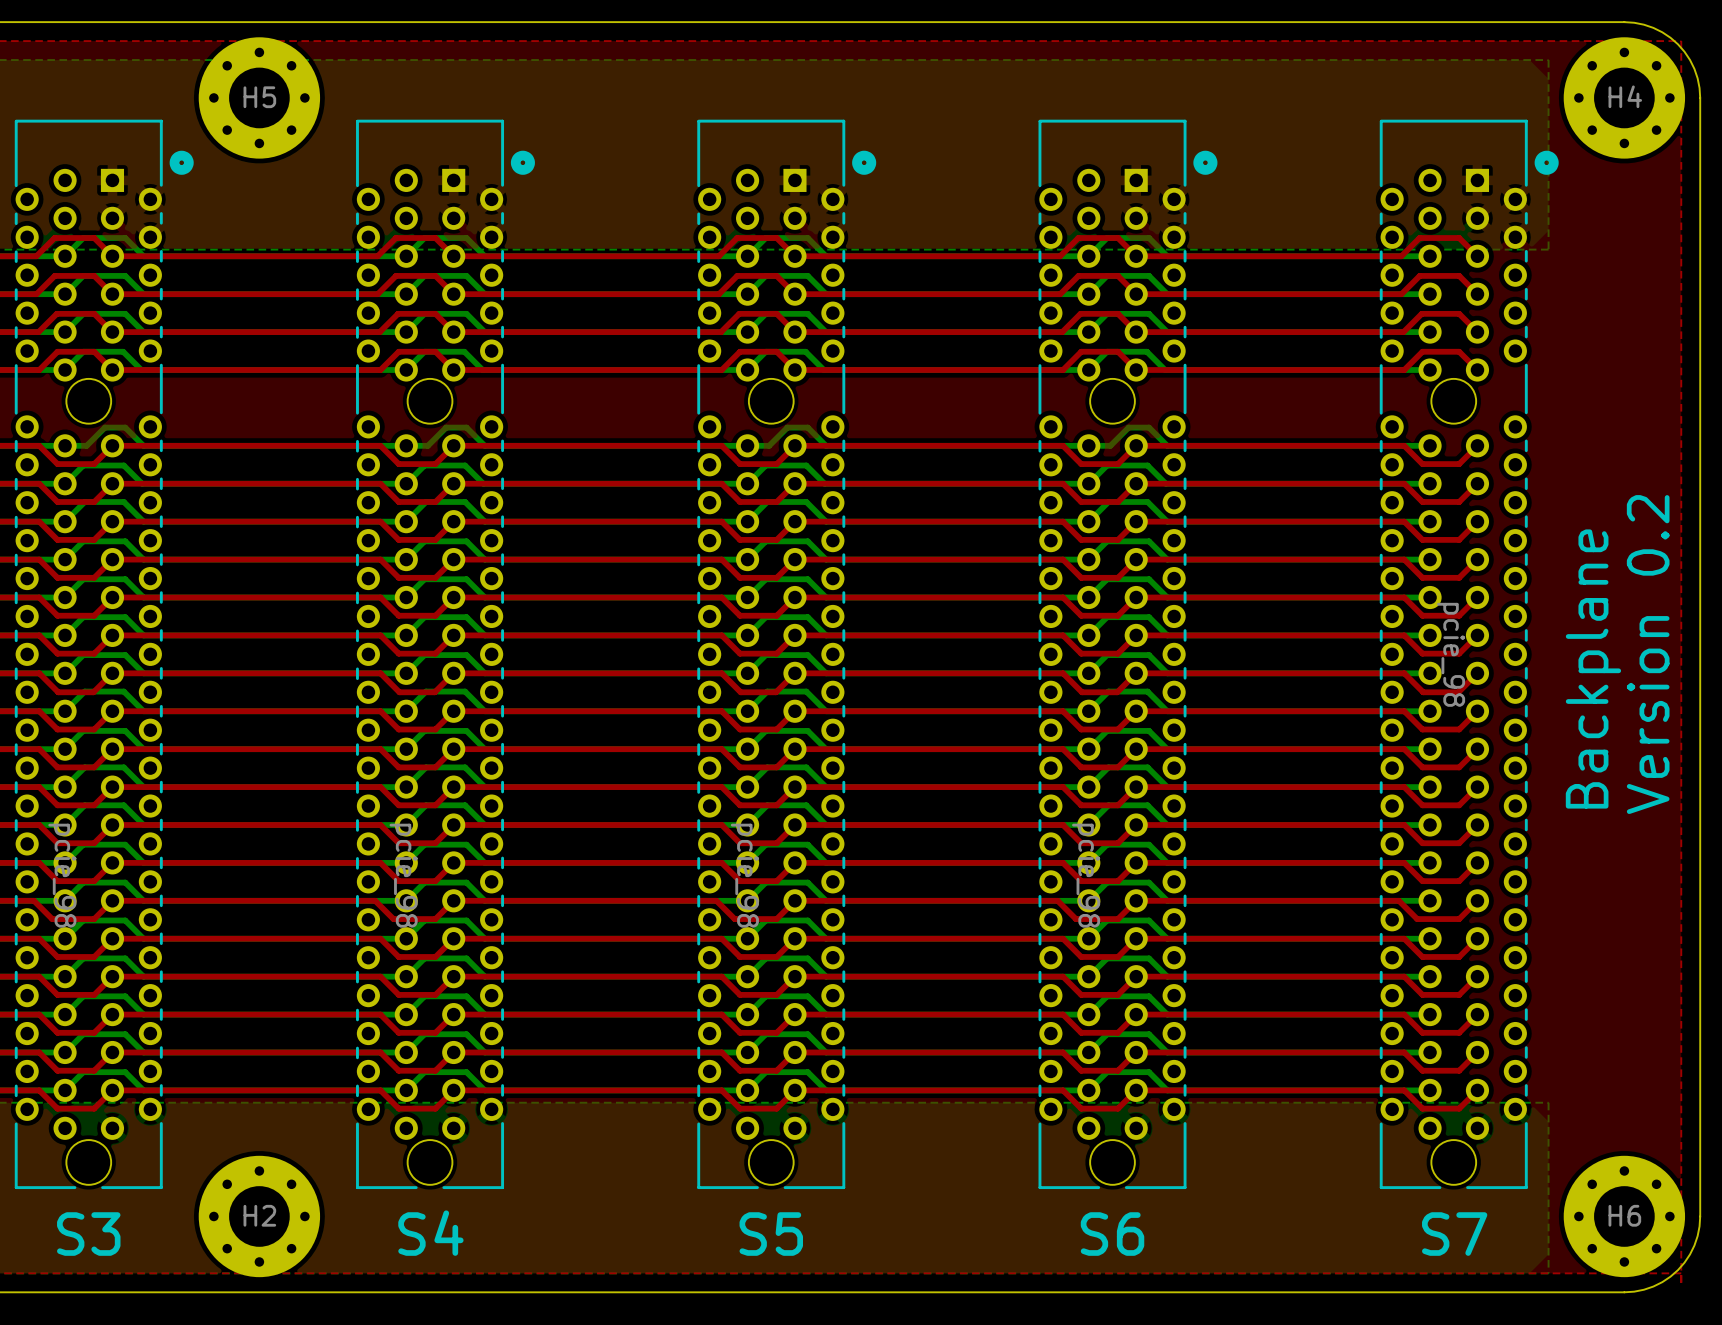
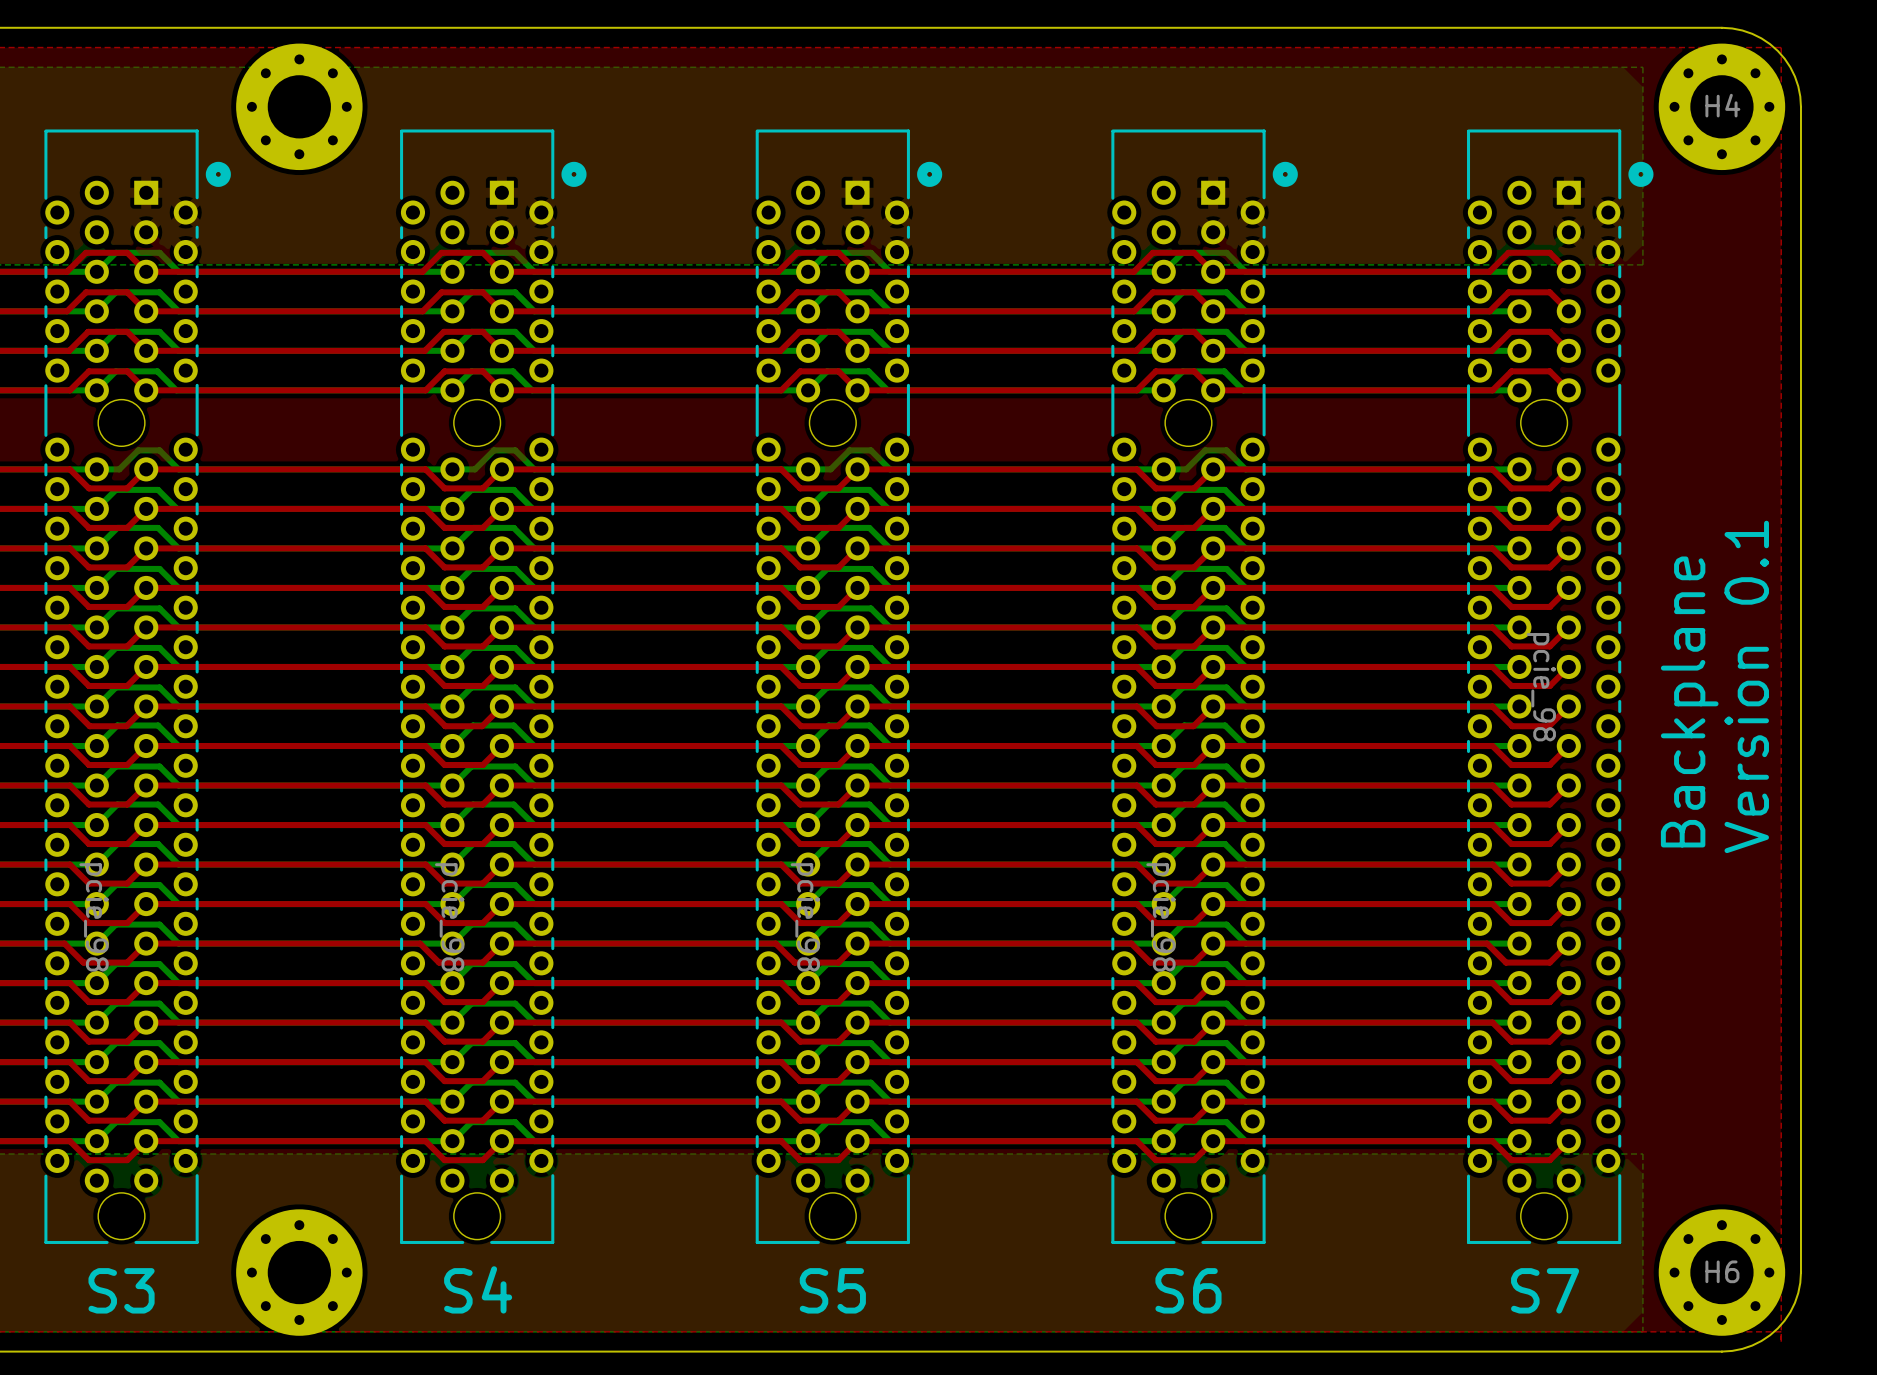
H5 name: H5 (259, 97) -> none
text: Version 0.2 (1648, 654) -> Version 0.1 (1746, 686)
H2 name: H2 (259, 1215) -> none

